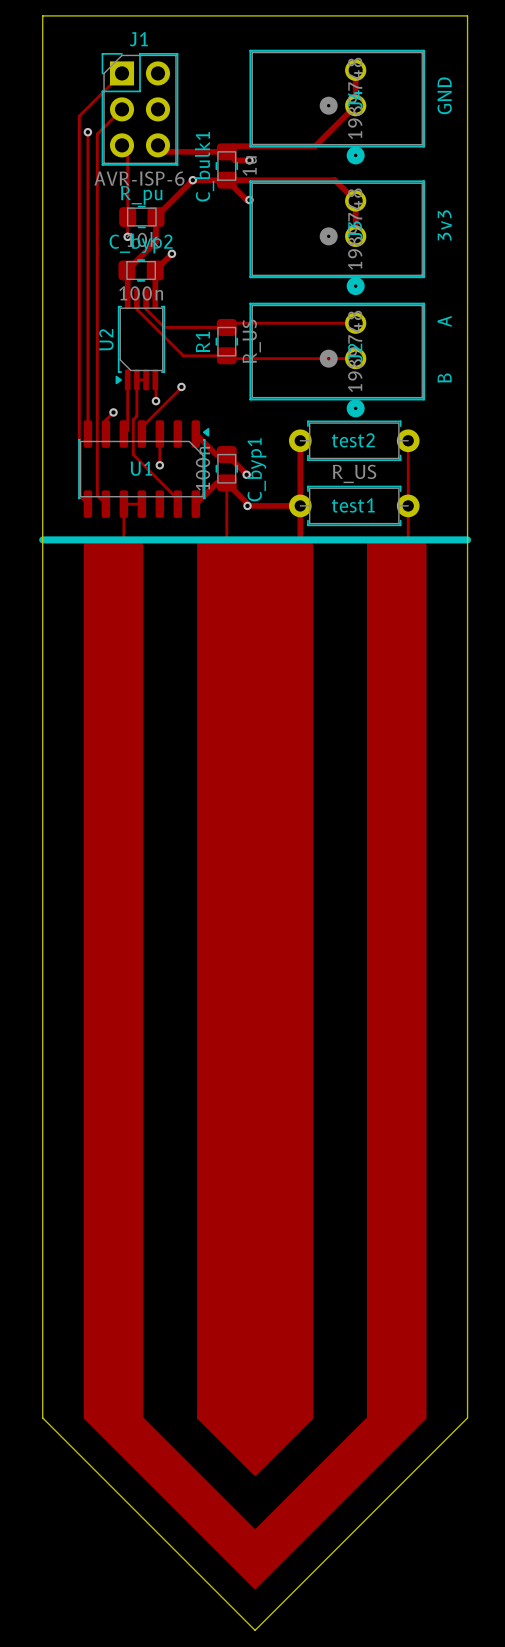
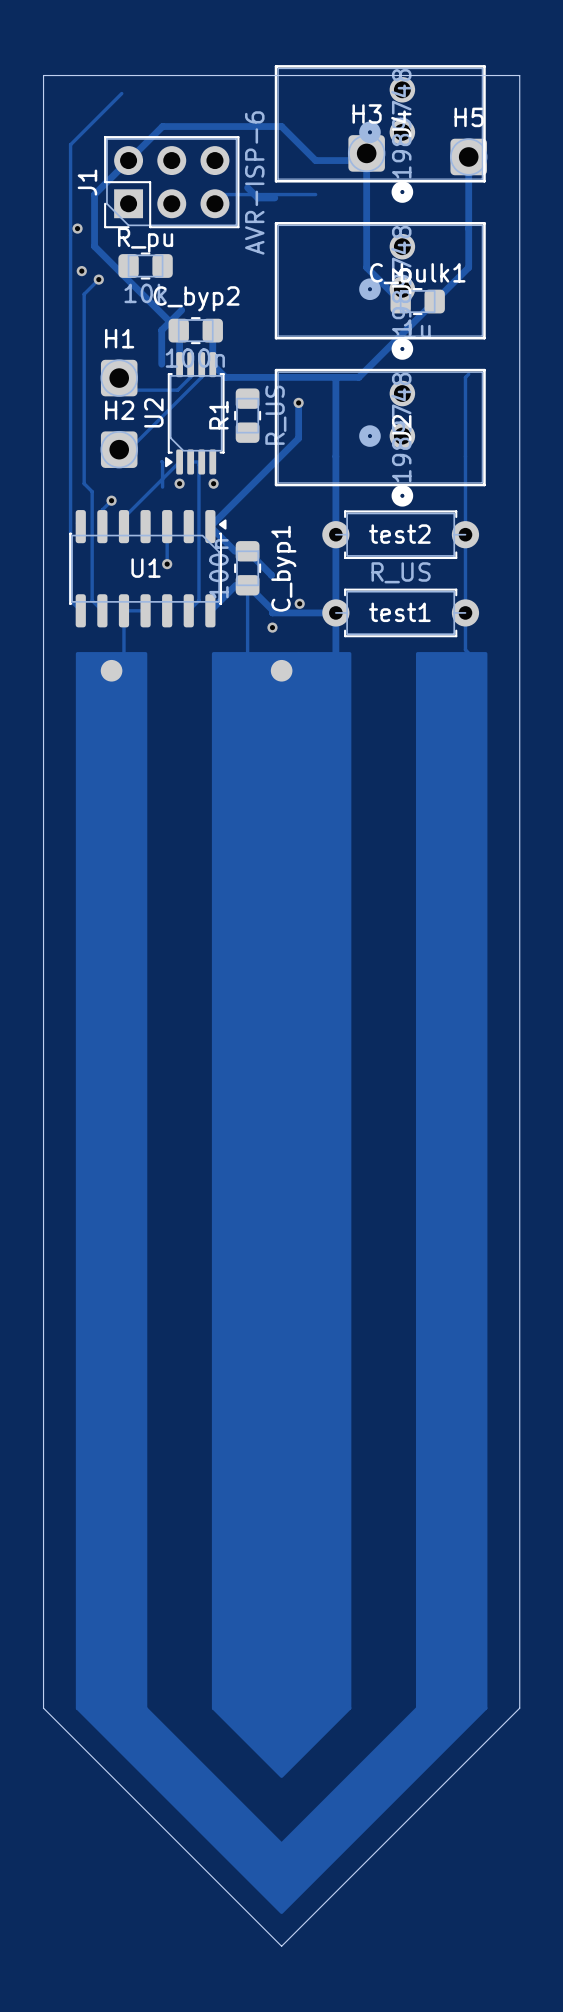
board edge: (42, 15) (467, 15) (467, 1417) (255, 1630) (42, 1417) (42, 15) -> (43, 75) (43, 1708) (281, 1946) (519, 1708) (519, 75) (43, 75)
track: (355, 70) (355, 105) (315, 146) (232, 146) (226, 151) (164, 151) (157, 145) -> none
text: GND (444, 95) -> none
track: (122, 109) (97, 134) (97, 404) -> (98, 279) (84, 294) (84, 483) (92, 491)
J1 rotation: 0° (139, 109) -> 90° counterclockwise (171, 182)
H3: none -> (366, 153)
track: none -> (468, 156) (468, 267) (358, 377) (225, 377) (212, 364) (212, 330)
H5: none -> (468, 156)
track: (87, 132) (87, 434) -> none
via: (87, 132) -> none
track: (127, 151) (127, 236) -> none
track: none -> (315, 194) (224, 194) (214, 204)
via: (249, 160) -> none
C_bulk1 rotation: 0° (226, 166) -> 90° clockwise (417, 301)
C_bulk1 position: (226, 166) -> (417, 301)
via: (192, 180) -> none
track: (226, 180) (246, 200) (249, 200) -> none
via: none -> (77, 228)
via: (249, 200) -> none
via: none -> (81, 271)
text: 3v3 (444, 225) -> none
via: none -> (98, 279)
via: (127, 236) -> none
track: (355, 236) (355, 200) (334, 180) (192, 180) (156, 217) (156, 241) (126, 270) (127, 298) -> none
track: none -> (400, 301) (366, 267) (366, 153) (359, 160) (315, 160) (281, 126) (162, 126) (94, 194) (94, 246) (179, 331) (179, 364)
via: (171, 253) -> none
C_byp2 position: (141, 270) -> (195, 330)
track: (136, 298) (136, 309) (183, 355) (226, 355) (229, 358) (355, 358) -> none
track: (146, 298) (146, 309) (164, 327) (226, 327) (231, 323) (355, 323) -> none
track: none -> (190, 364) (190, 377) (177, 390) (131, 390) (119, 378)
track: none -> (201, 364) (201, 377) (129, 449) (119, 449)
track: none -> (468, 374) (465, 377) (465, 534)
track: none -> (335, 377) (335, 534)
H1: none -> (119, 378)
text: A (444, 321) -> none
track: none -> (298, 402) (298, 438) (210, 526)
via: none -> (298, 402)
U2 position: (140, 339) -> (194, 413)
H2: none -> (119, 449)
text: B (444, 378) -> none
track: (127, 379) (127, 430) (123, 434) -> none
track: (146, 379) (136, 379) (136, 416) (133, 419) (133, 454) (177, 499) (177, 504) -> (190, 462) (201, 462) (198, 464) (198, 600) (188, 610)
track: none -> (179, 462) (123, 517)
track: (181, 386) (141, 427) -> none
via: (181, 386) -> none
via: none -> (179, 483)
via: none -> (213, 483)
via: (156, 401) -> none
via: (246, 474) -> none
via: none -> (299, 603)
via: (247, 505) -> none
via: none -> (272, 627)
line: (42, 539) (467, 539) -> none

